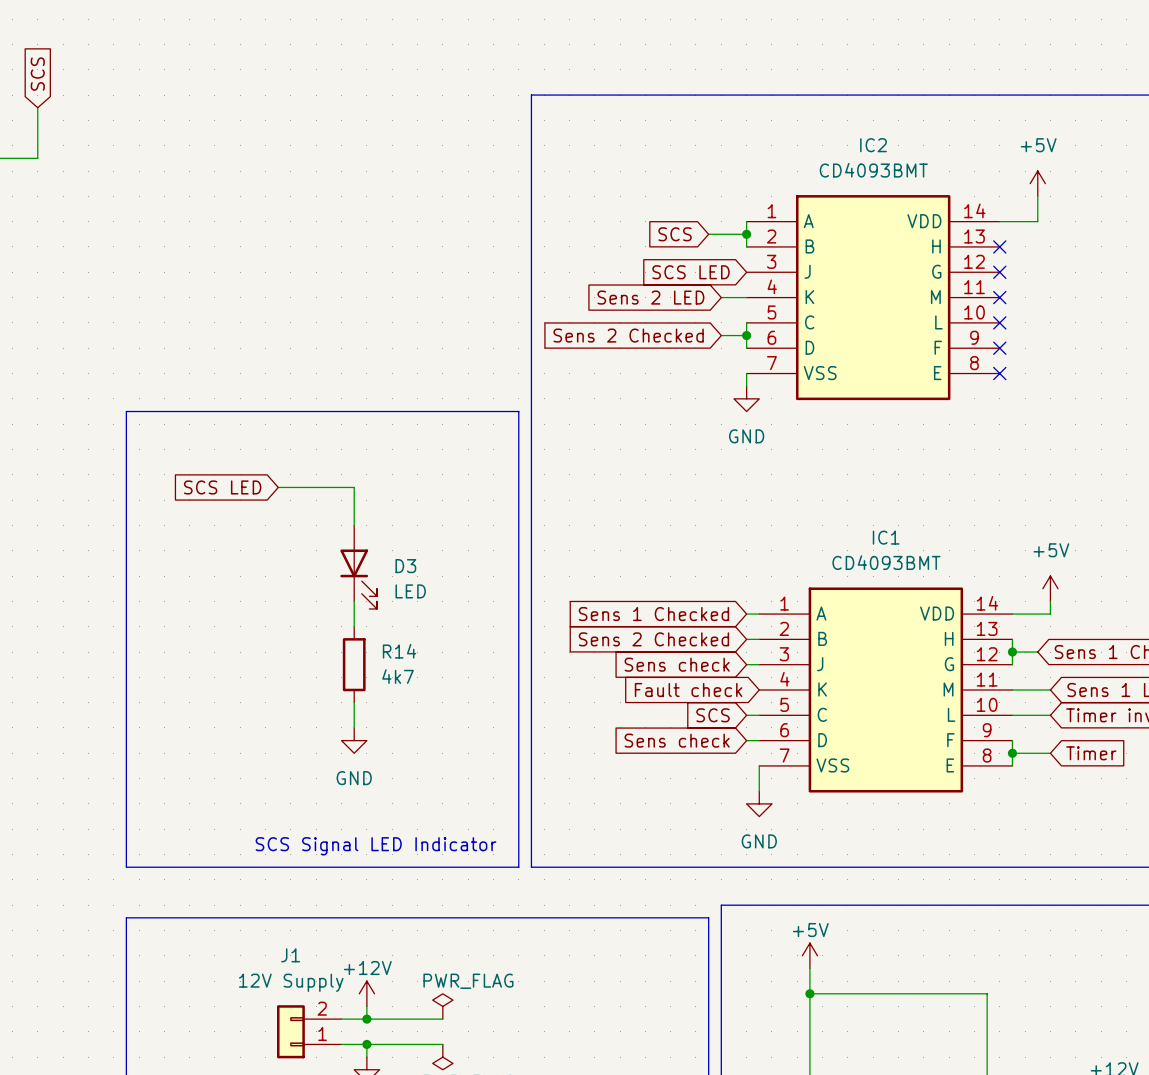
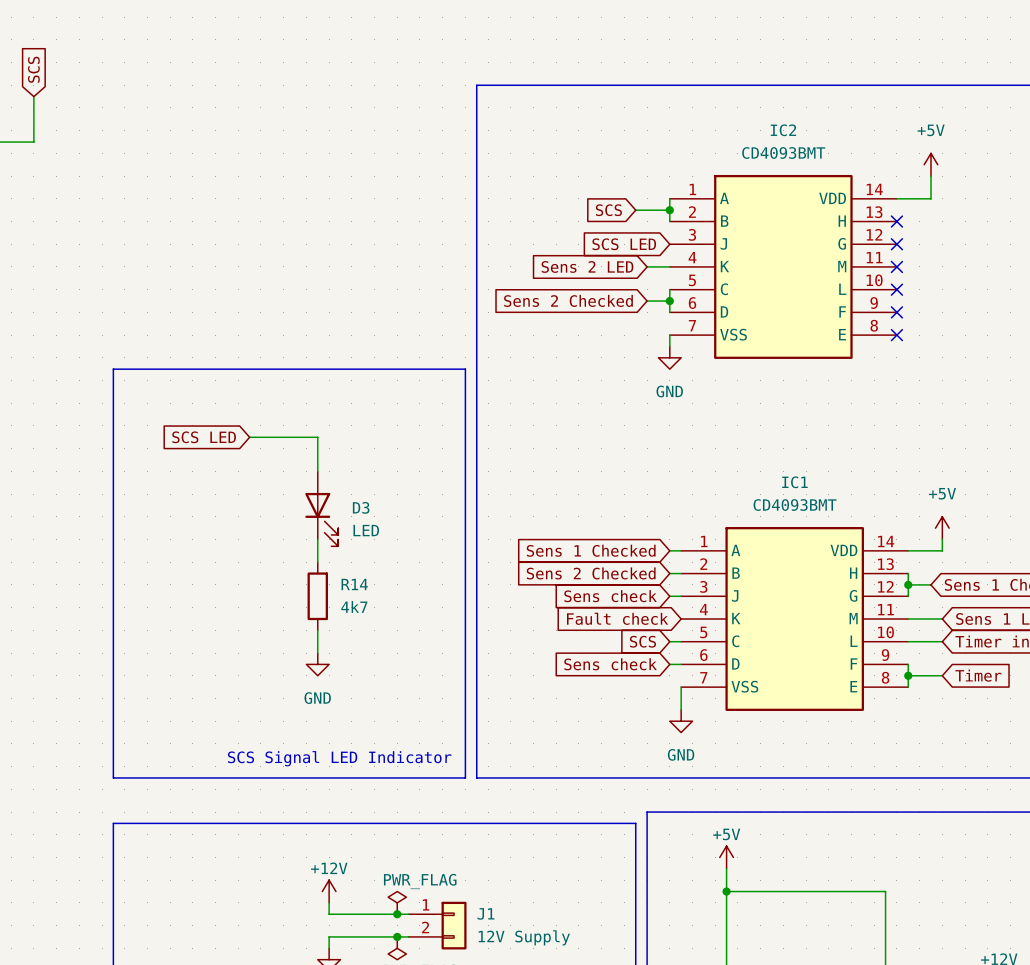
J1 name position: J1 (290, 955) -> J1 (486, 913)
J1 value position: 12V Supply (291, 982) -> 12V Supply (524, 937)
wire: (341, 1019) (366, 1019) -> none
junction: (366, 1019) -> none
wire: none -> (397, 914) (408, 914)
junction: none -> (397, 914)
J1 rotation: 0° (290, 1031) -> 180° (454, 925)
J1 position: (309, 1031) -> (437, 925)
wire: (341, 1044) (366, 1044) -> none
junction: (366, 1044) -> none
wire: none -> (397, 936) (408, 936)
junction: none -> (397, 936)

